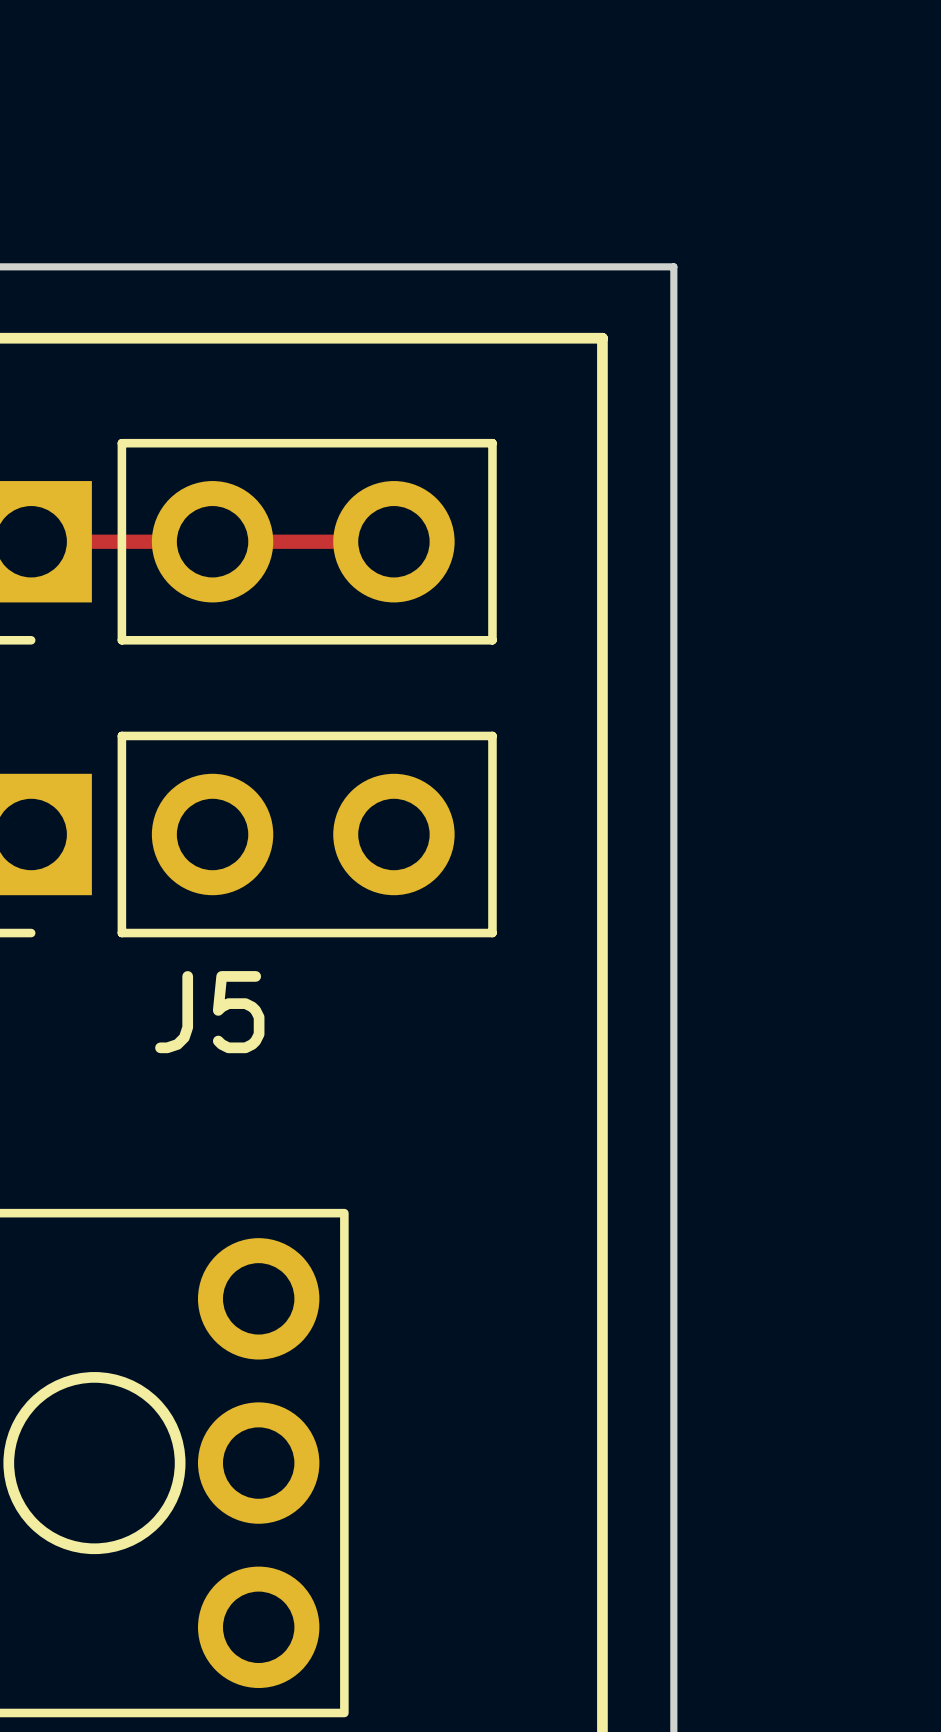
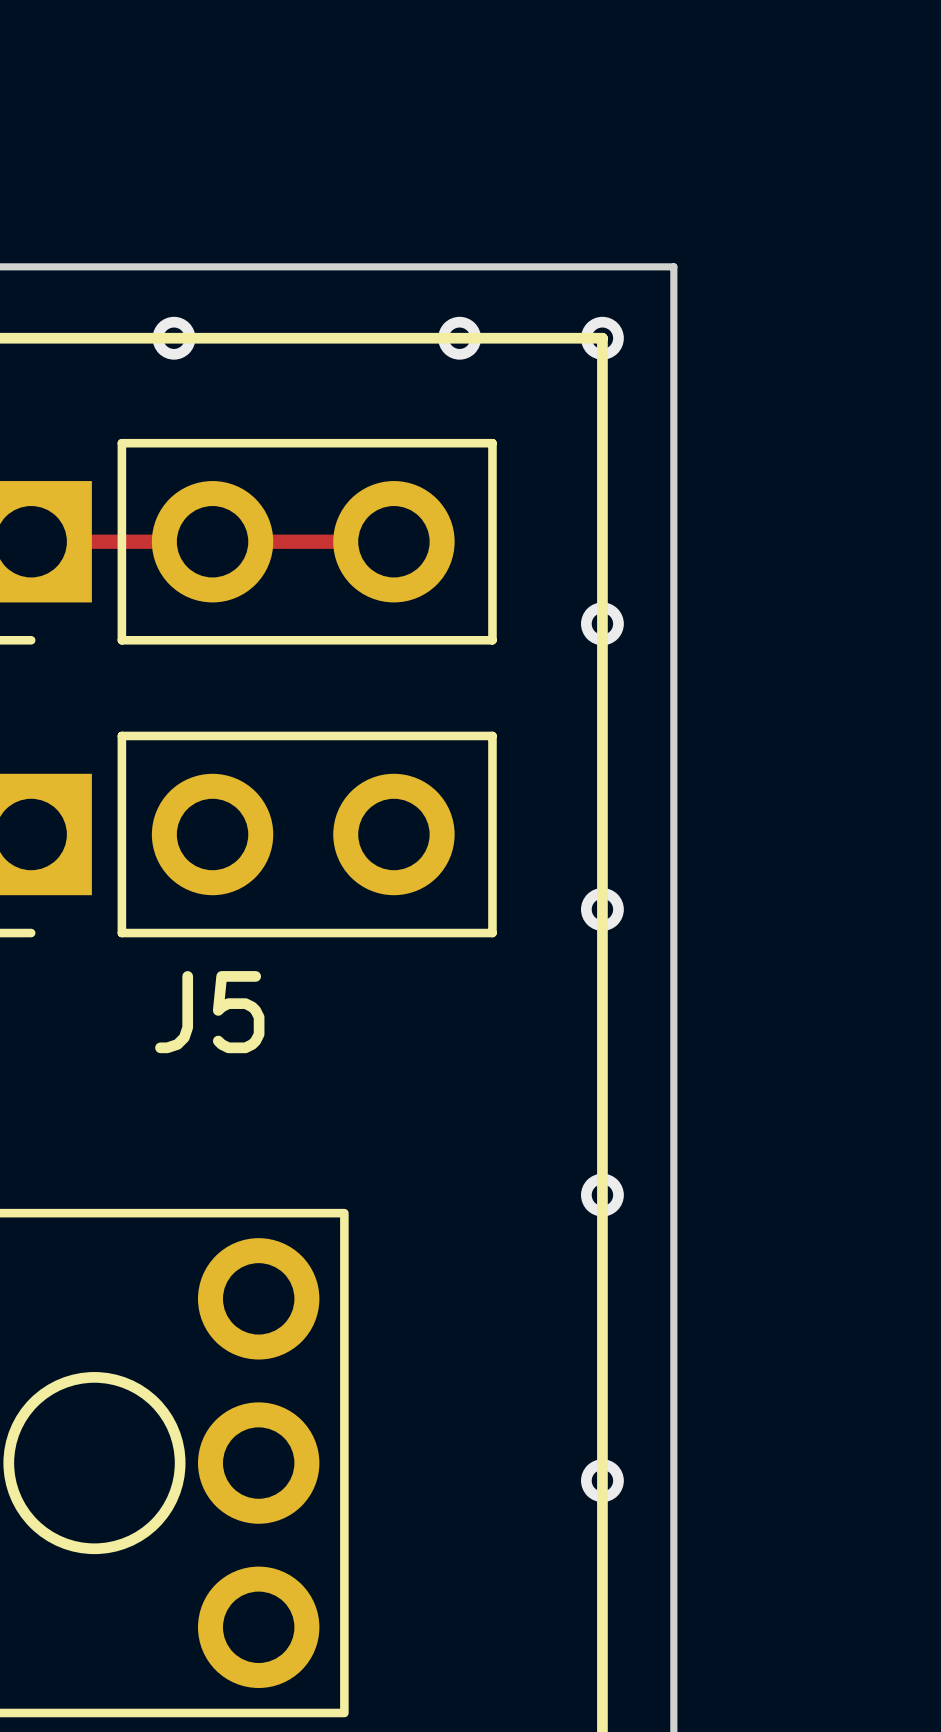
via: none -> (174, 338)
via: none -> (459, 338)
via: none -> (602, 338)
via: none -> (602, 623)
via: none -> (602, 909)
via: none -> (602, 1195)
via: none -> (602, 1480)

